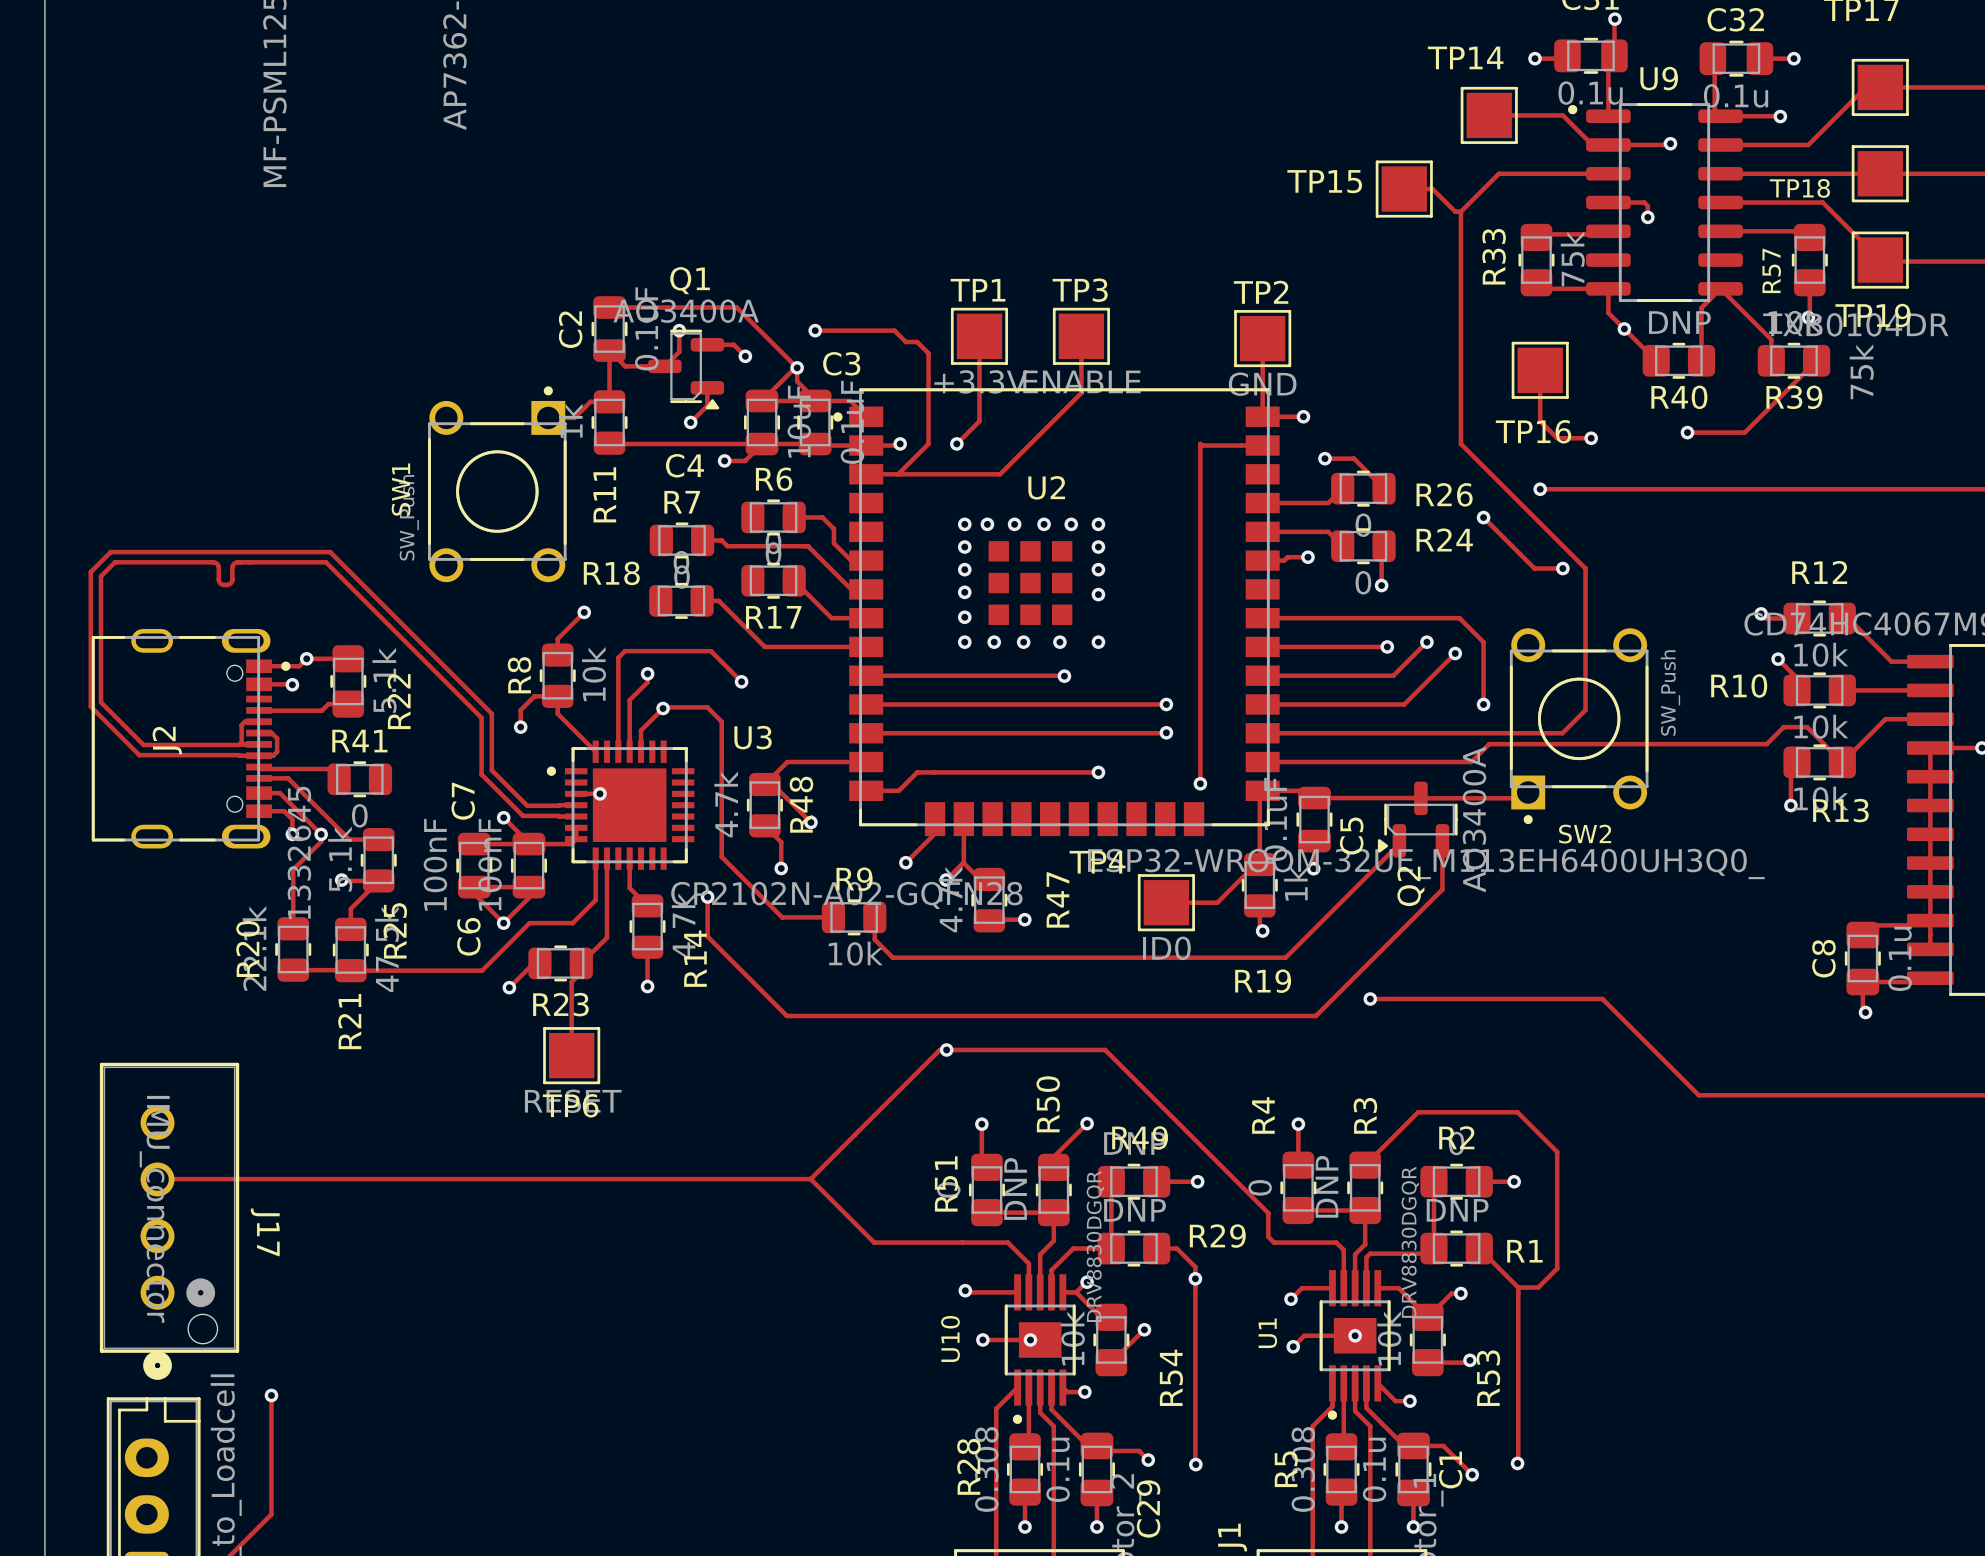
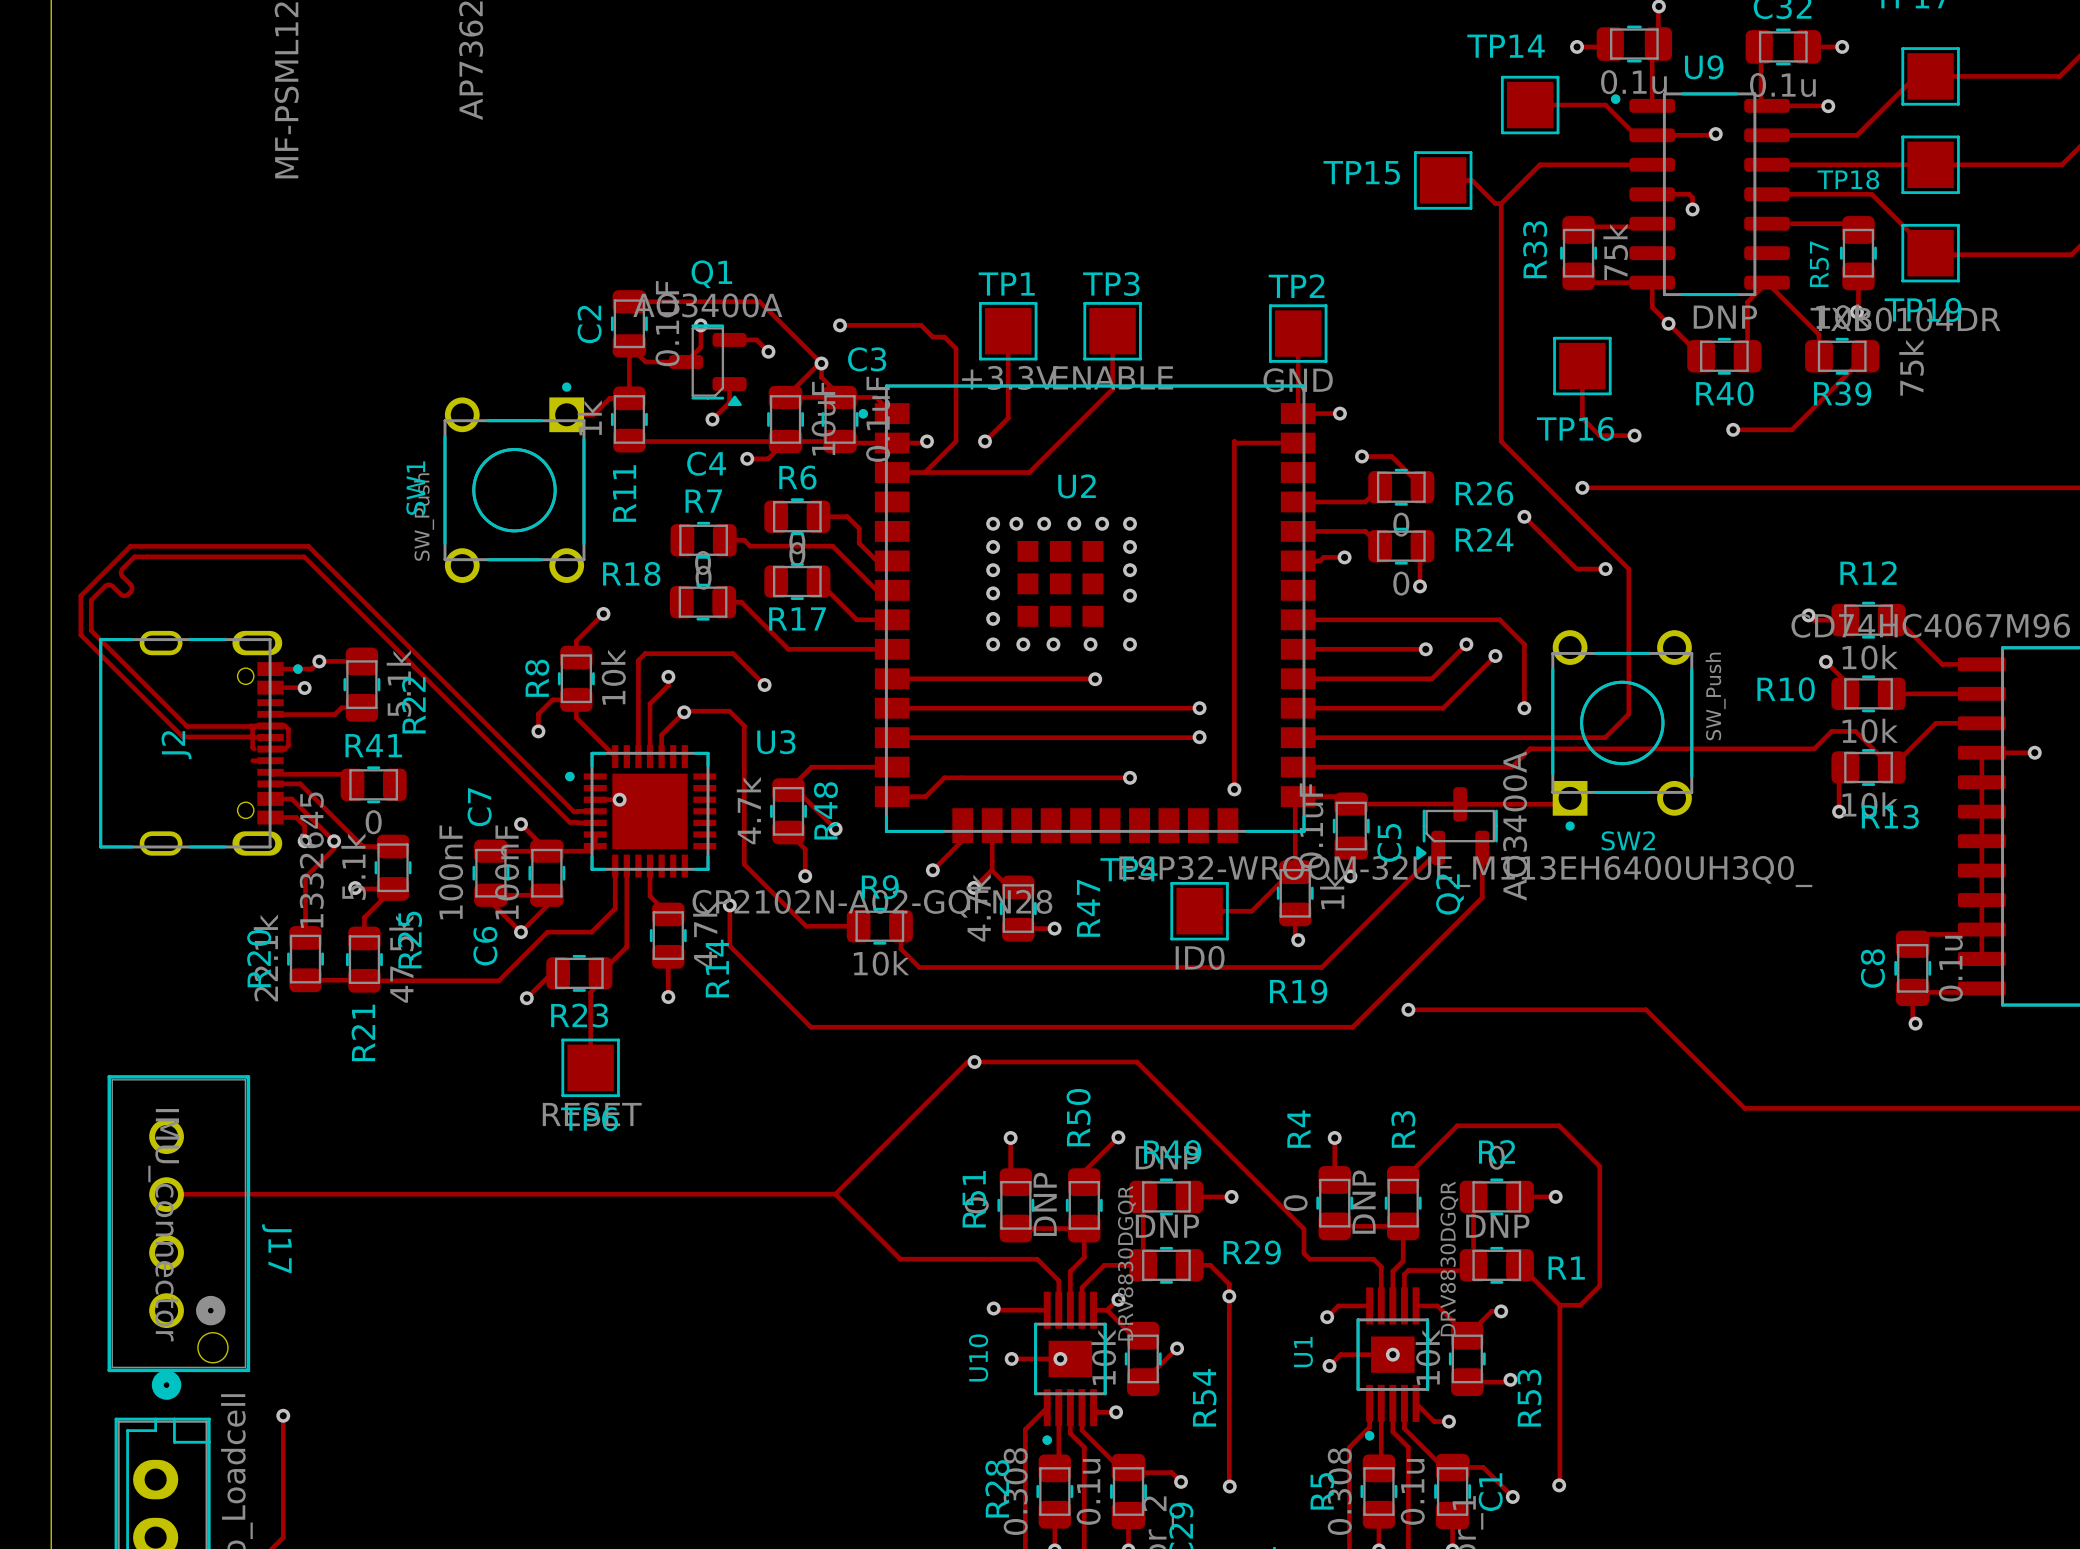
track: none -> (270, 725) (284, 725) (288, 729) (288, 745) (284, 749) (270, 749)
track: (259, 733) (271, 733) (277, 738) (277, 751) (273, 755) (259, 755) -> none
track: (259, 744) (143, 744) (101, 702) (101, 576) (115, 562) (214, 562) (218, 566) (219, 581) (224, 584) (231, 581) (232, 566) (236, 562) (326, 562) (481, 717) (481, 774) (523, 815) (551, 815) -> (256, 725) (187, 726) (91, 630) (91, 600) (108, 584) (112, 585) (122, 595) (128, 594) (131, 586) (121, 572) (134, 556) (304, 556) (569, 822)
track: (241, 755) (139, 755) (90, 706) (90, 572) (110, 552) (330, 552) (491, 713) (491, 770) (527, 805) (555, 805) -> (270, 737) (182, 736) (80, 634) (80, 595) (130, 546) (308, 546) (574, 811)

